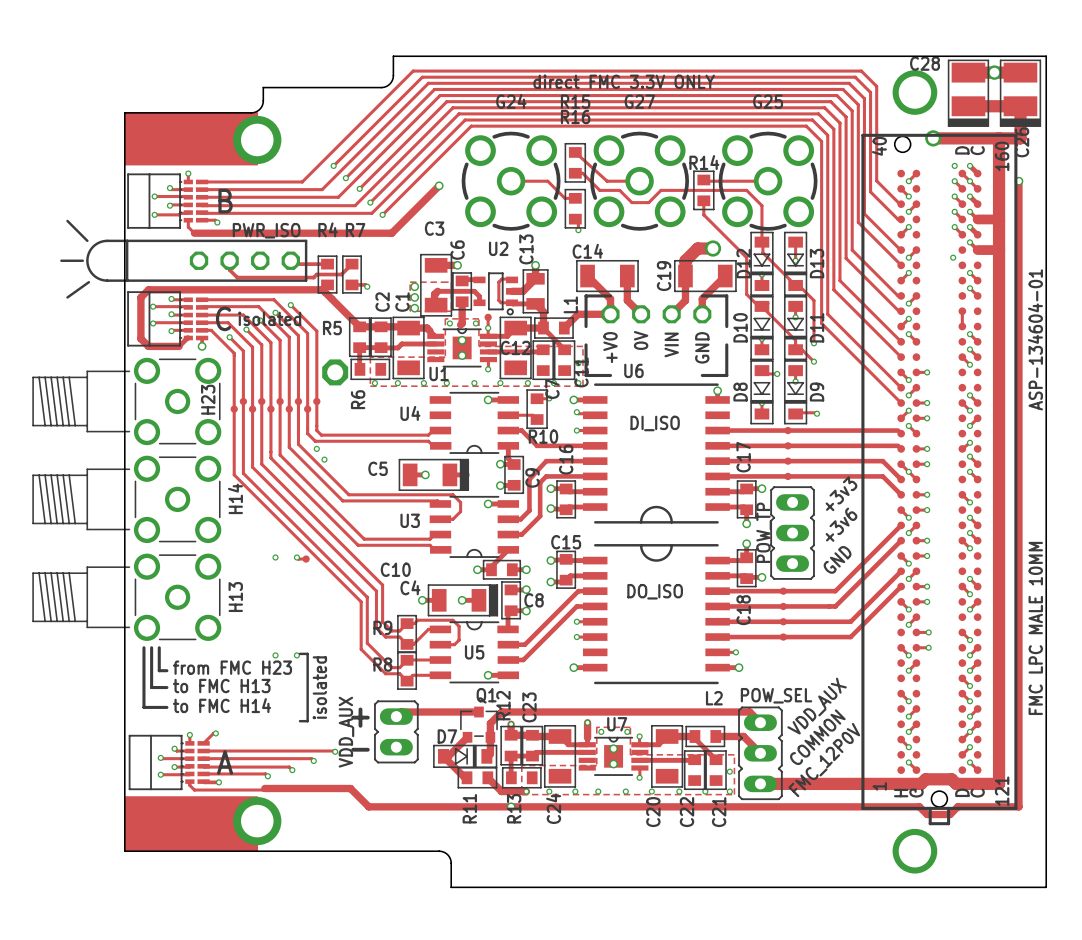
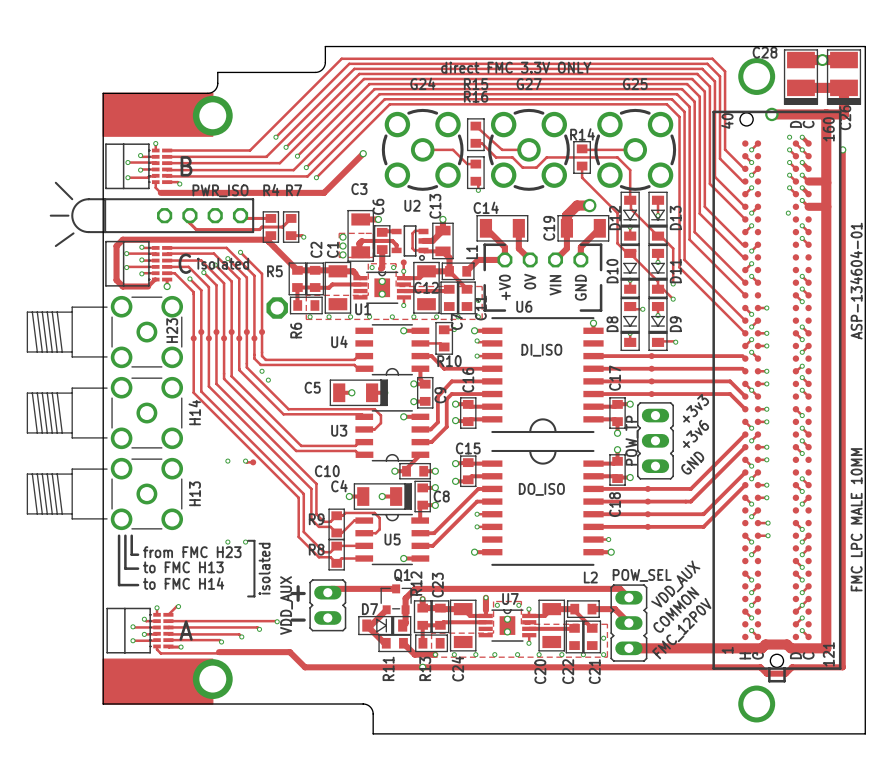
track: (962, 311) (962, 326) -> none

